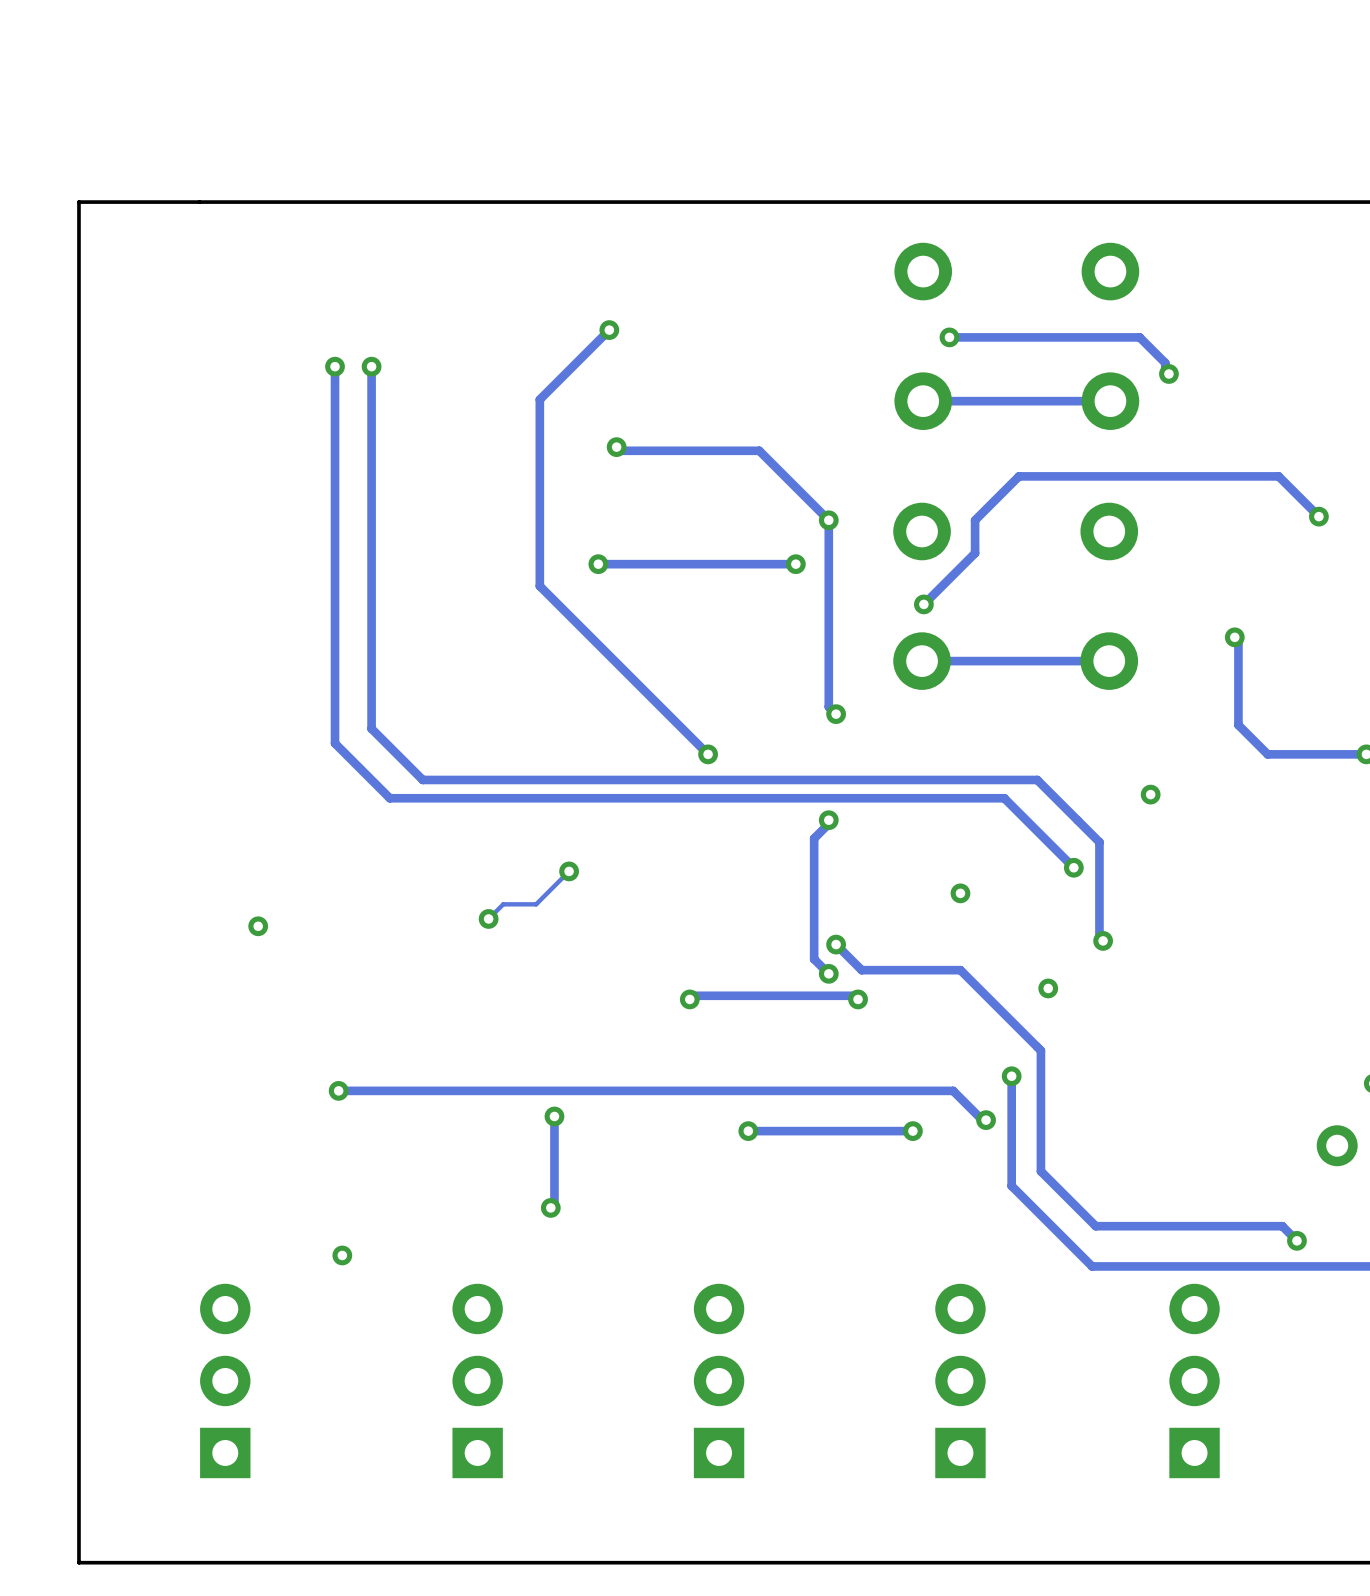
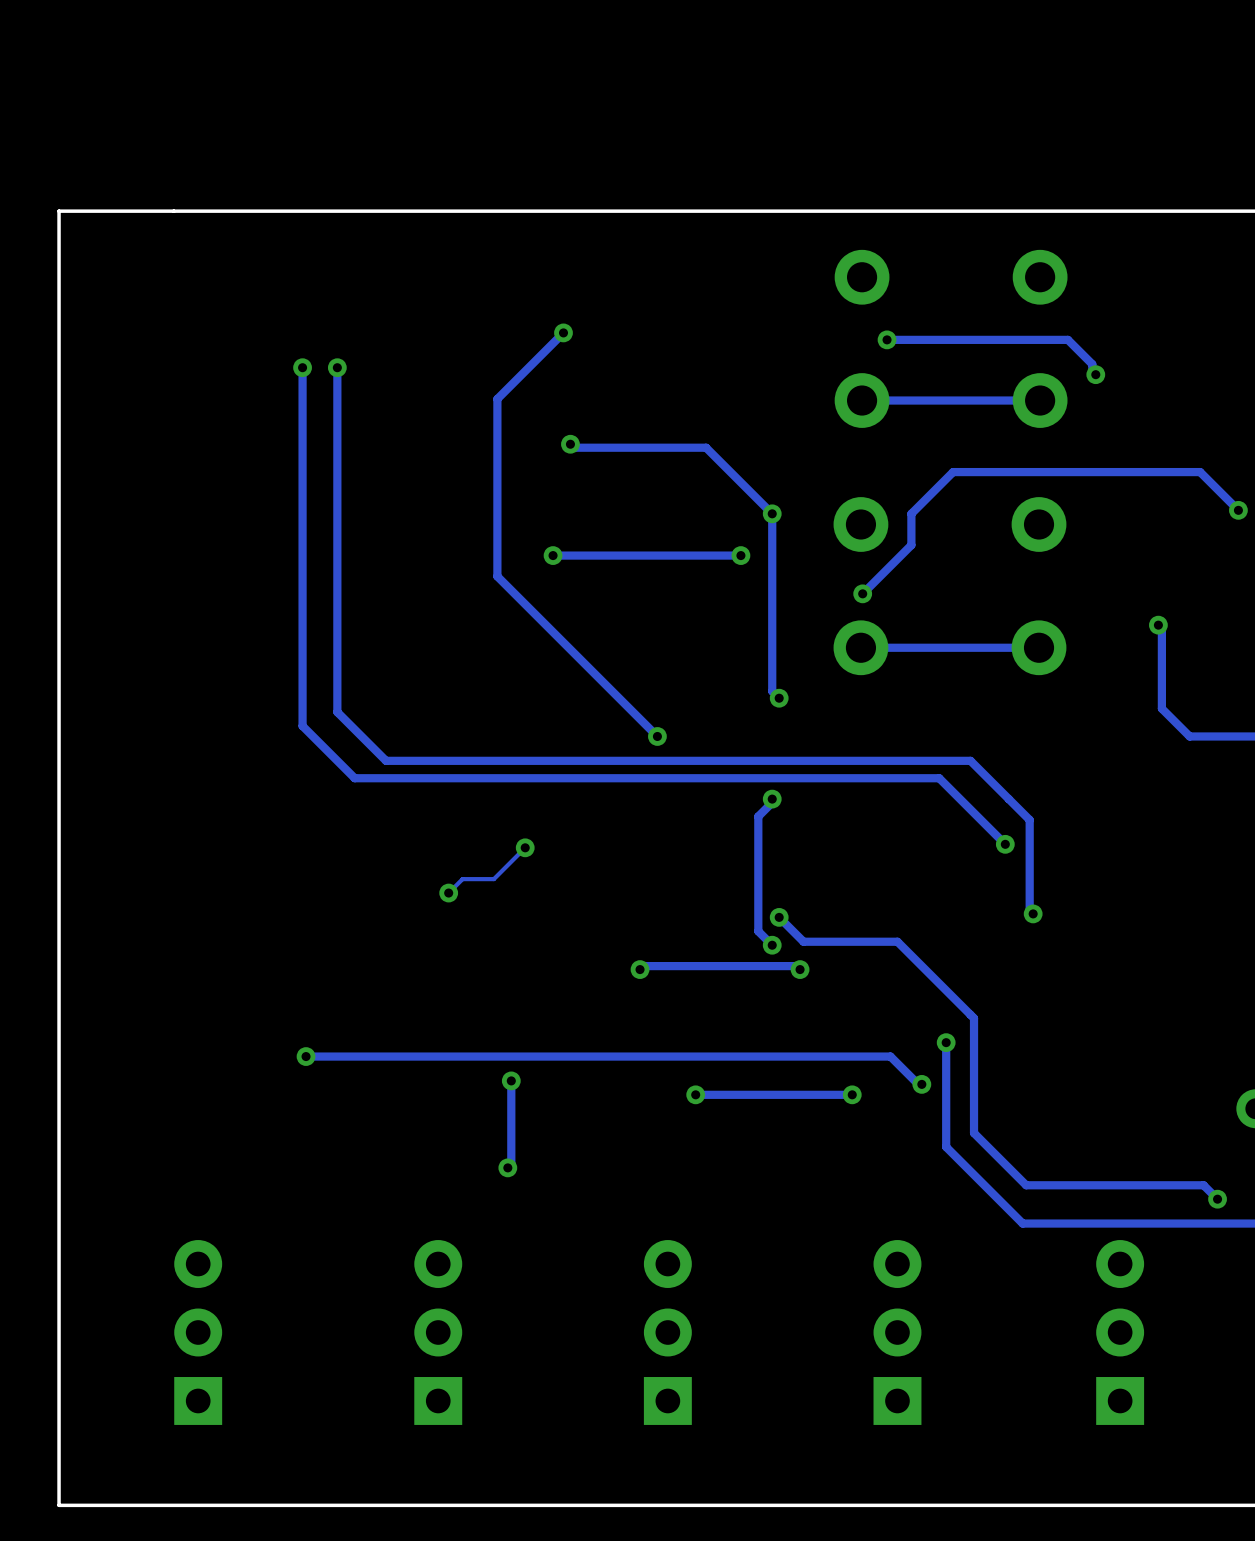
via: (1150, 794) -> none
via: (960, 893) -> none
via: (258, 926) -> none
via: (1048, 988) -> none
via: (342, 1255) -> none

